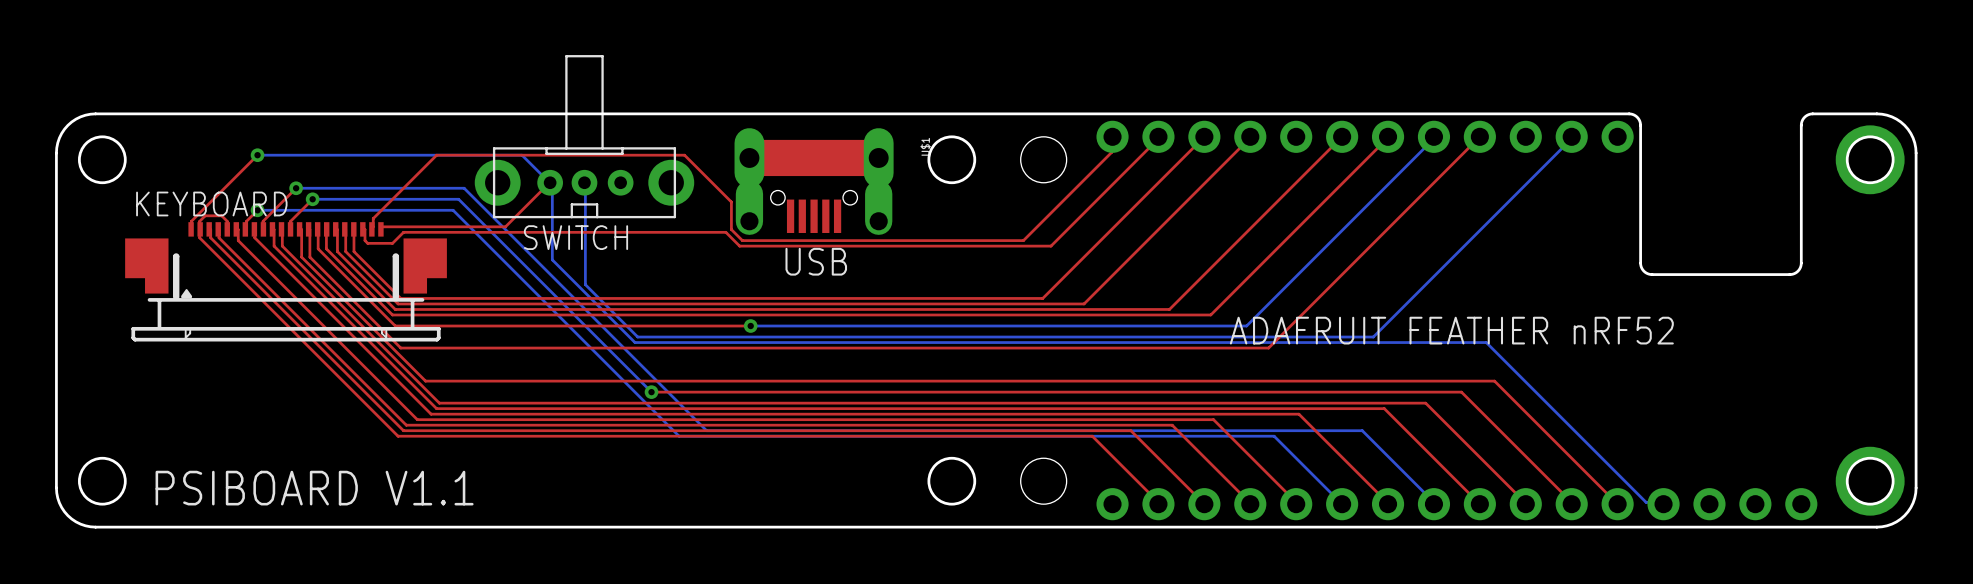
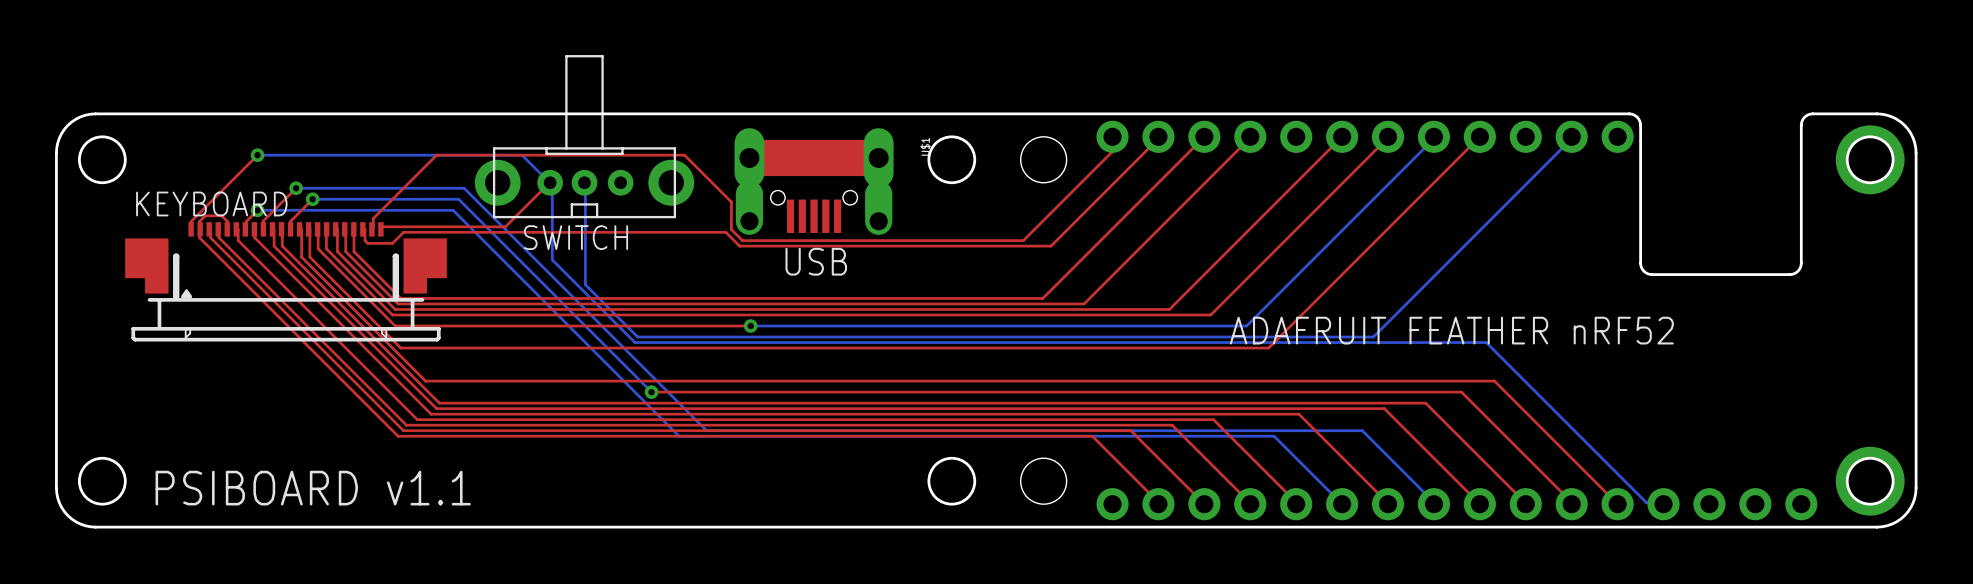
text: PSIBOARD V1.1 (314, 488) -> PSIBOARD v1.1 (313, 488)

